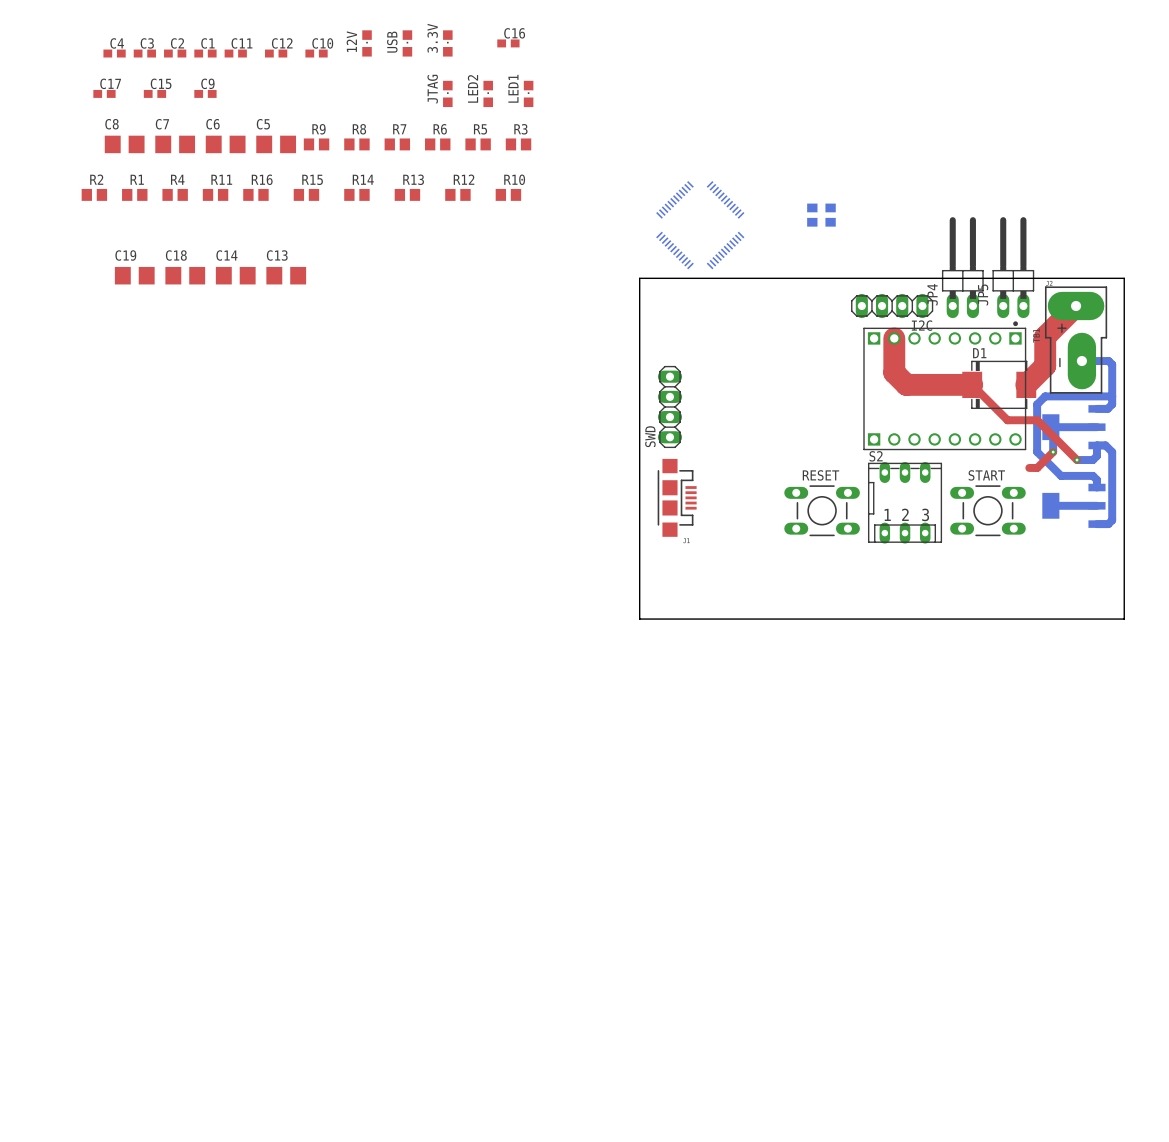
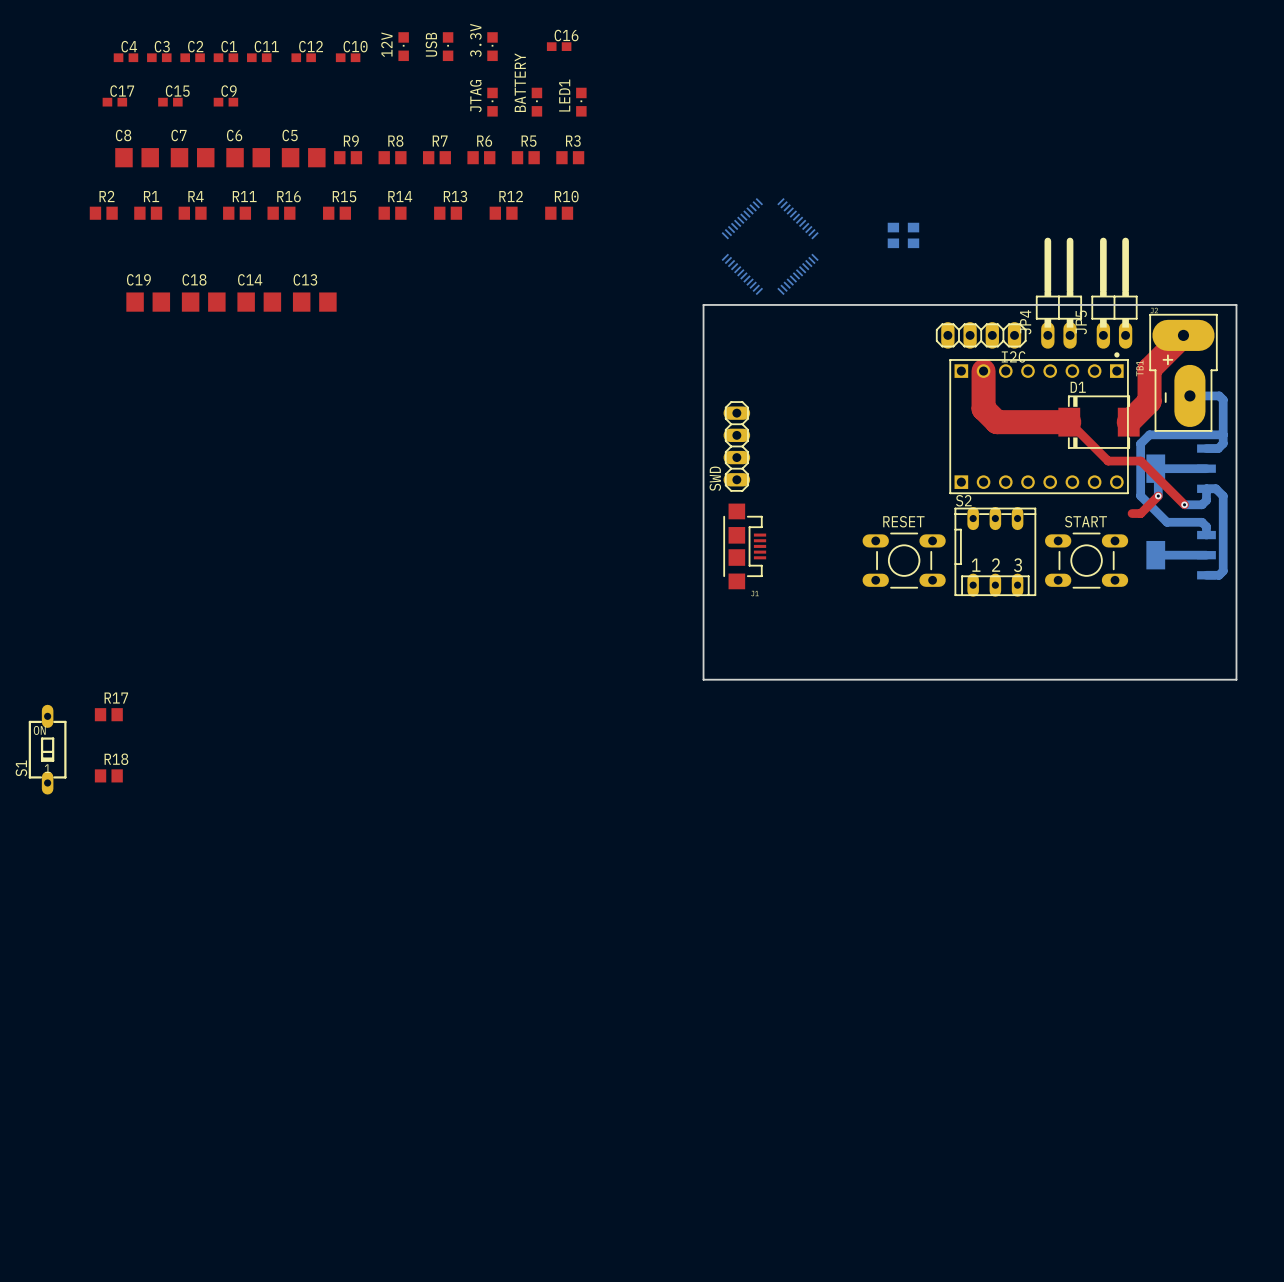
LED2 name: LED2 (472, 88) -> BATTERY (520, 82)
R17: none -> (108, 714)
S1: none -> (47, 749)
R18: none -> (108, 775)

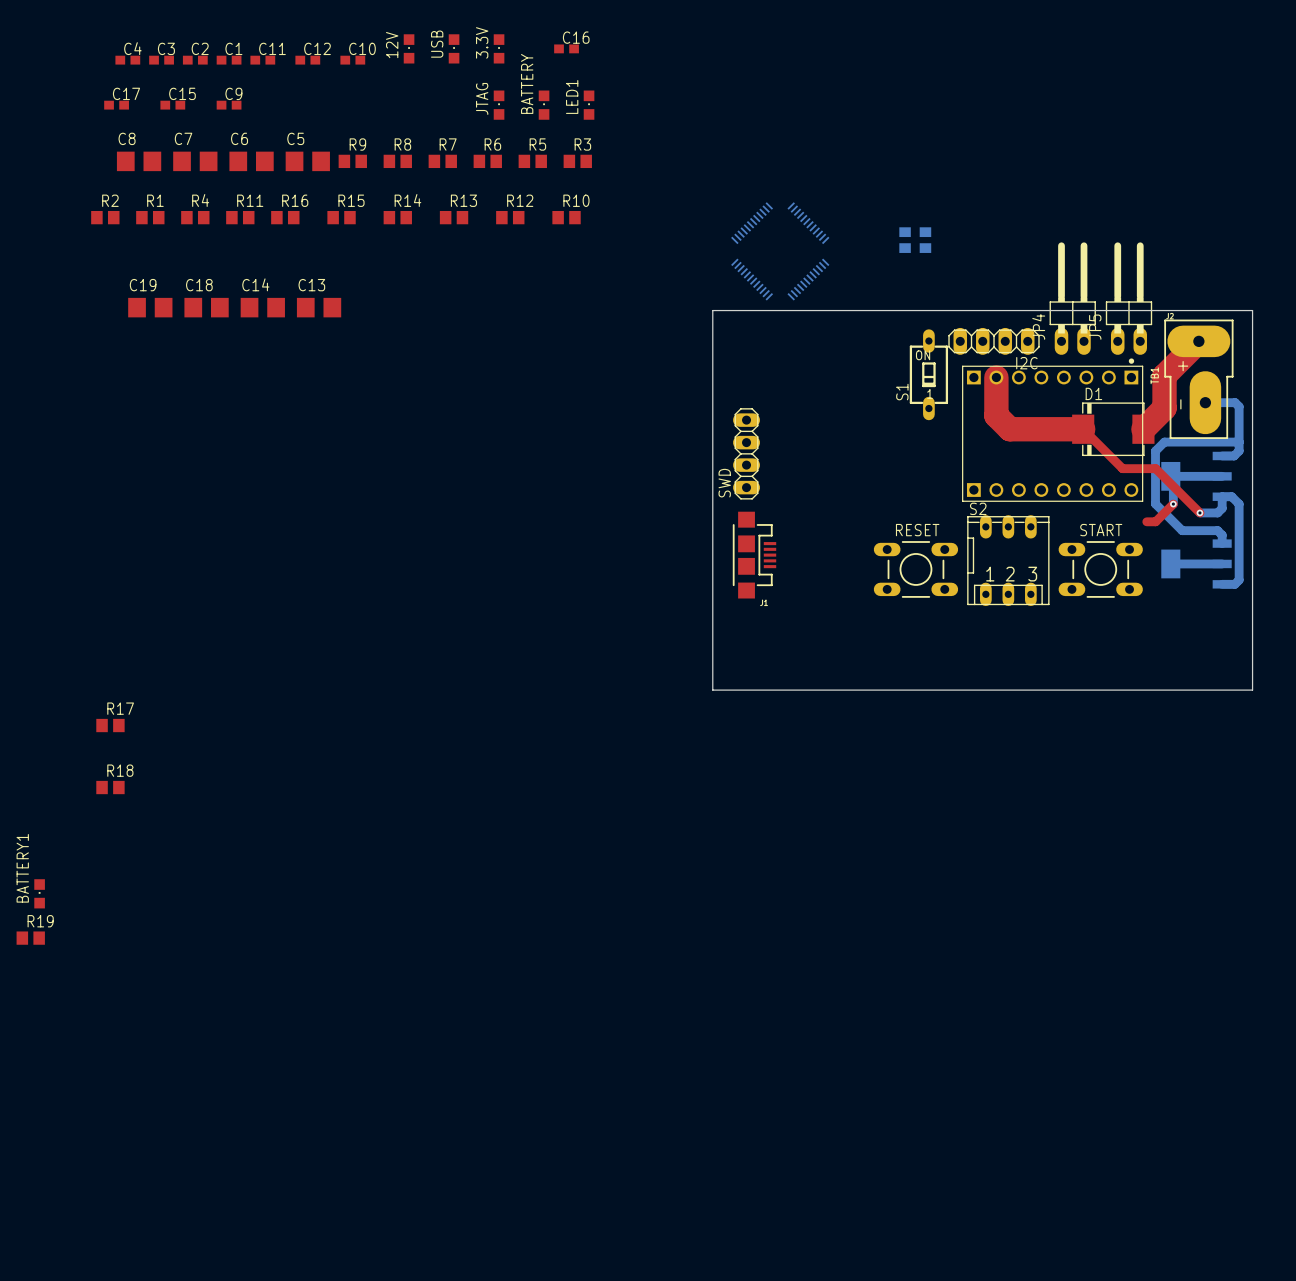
S1 position: (47, 749) -> (928, 374)
BATTERY1: none -> (39, 893)
R19: none -> (30, 938)

